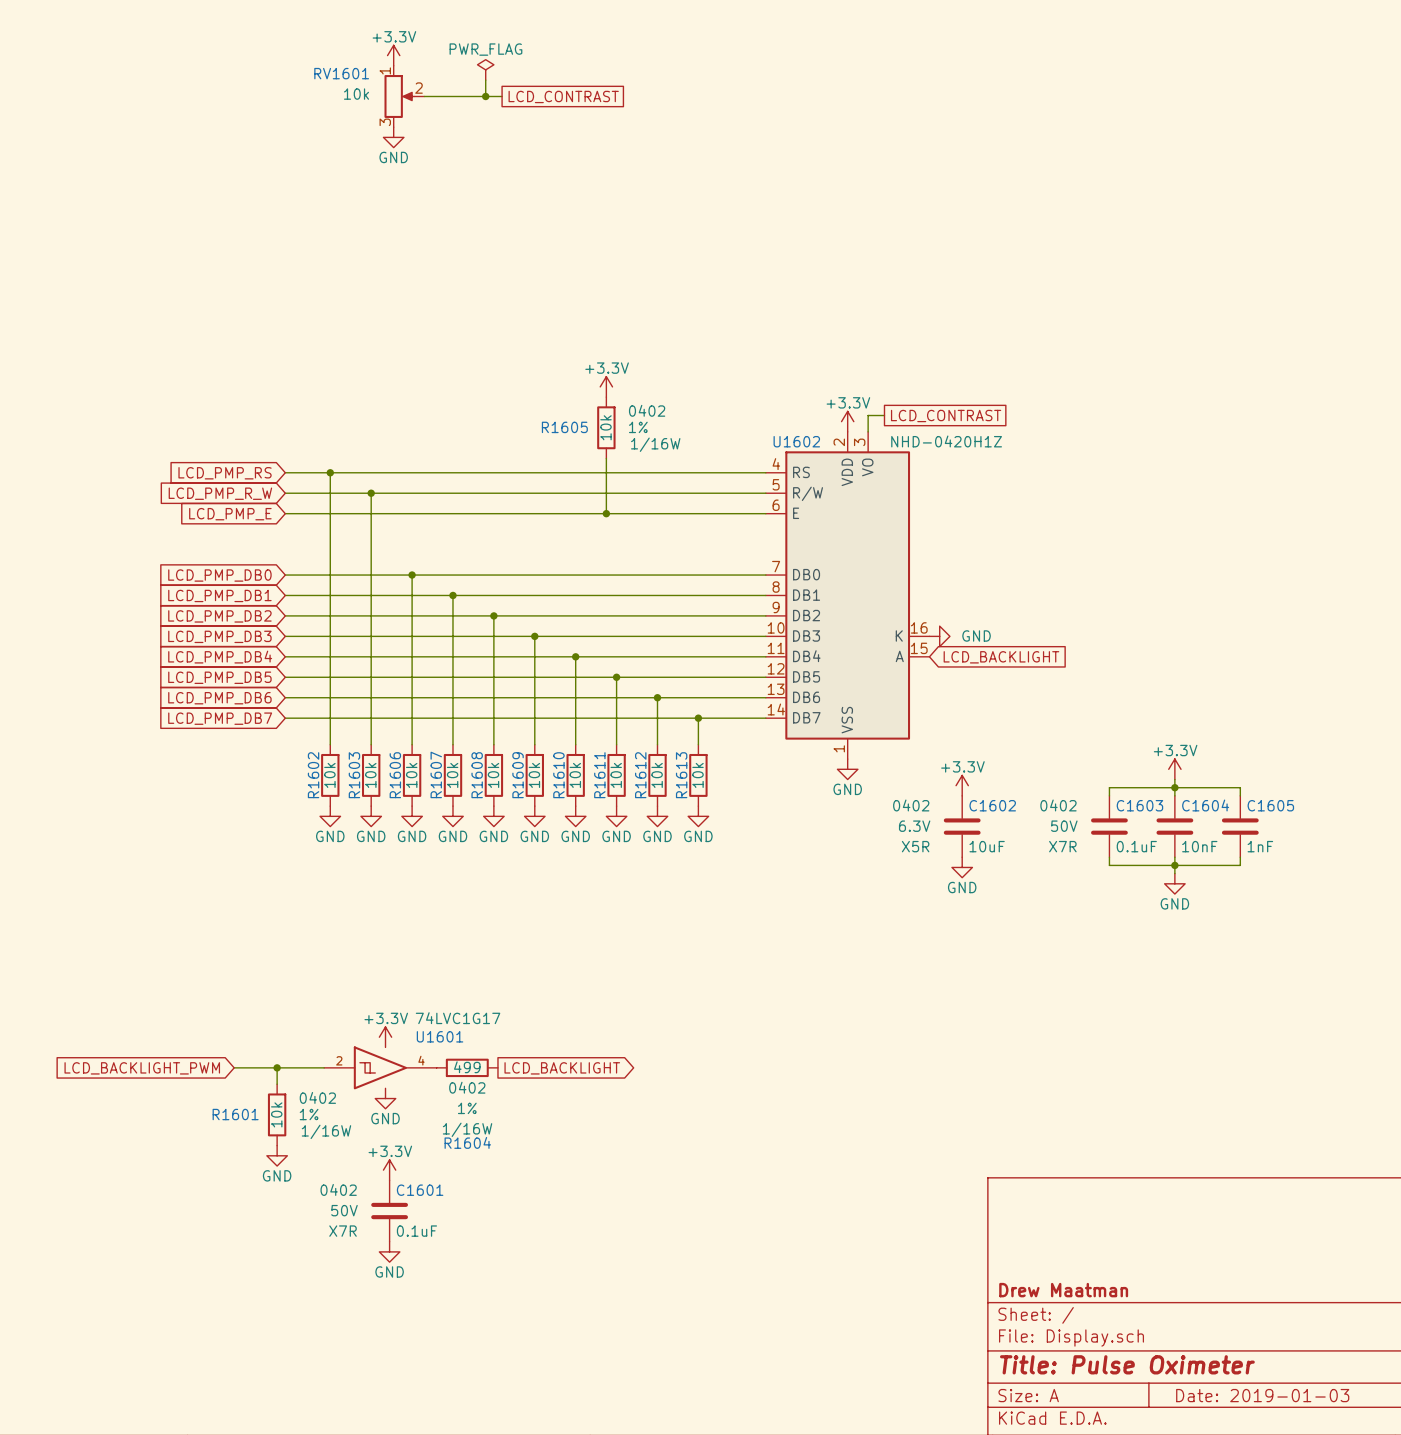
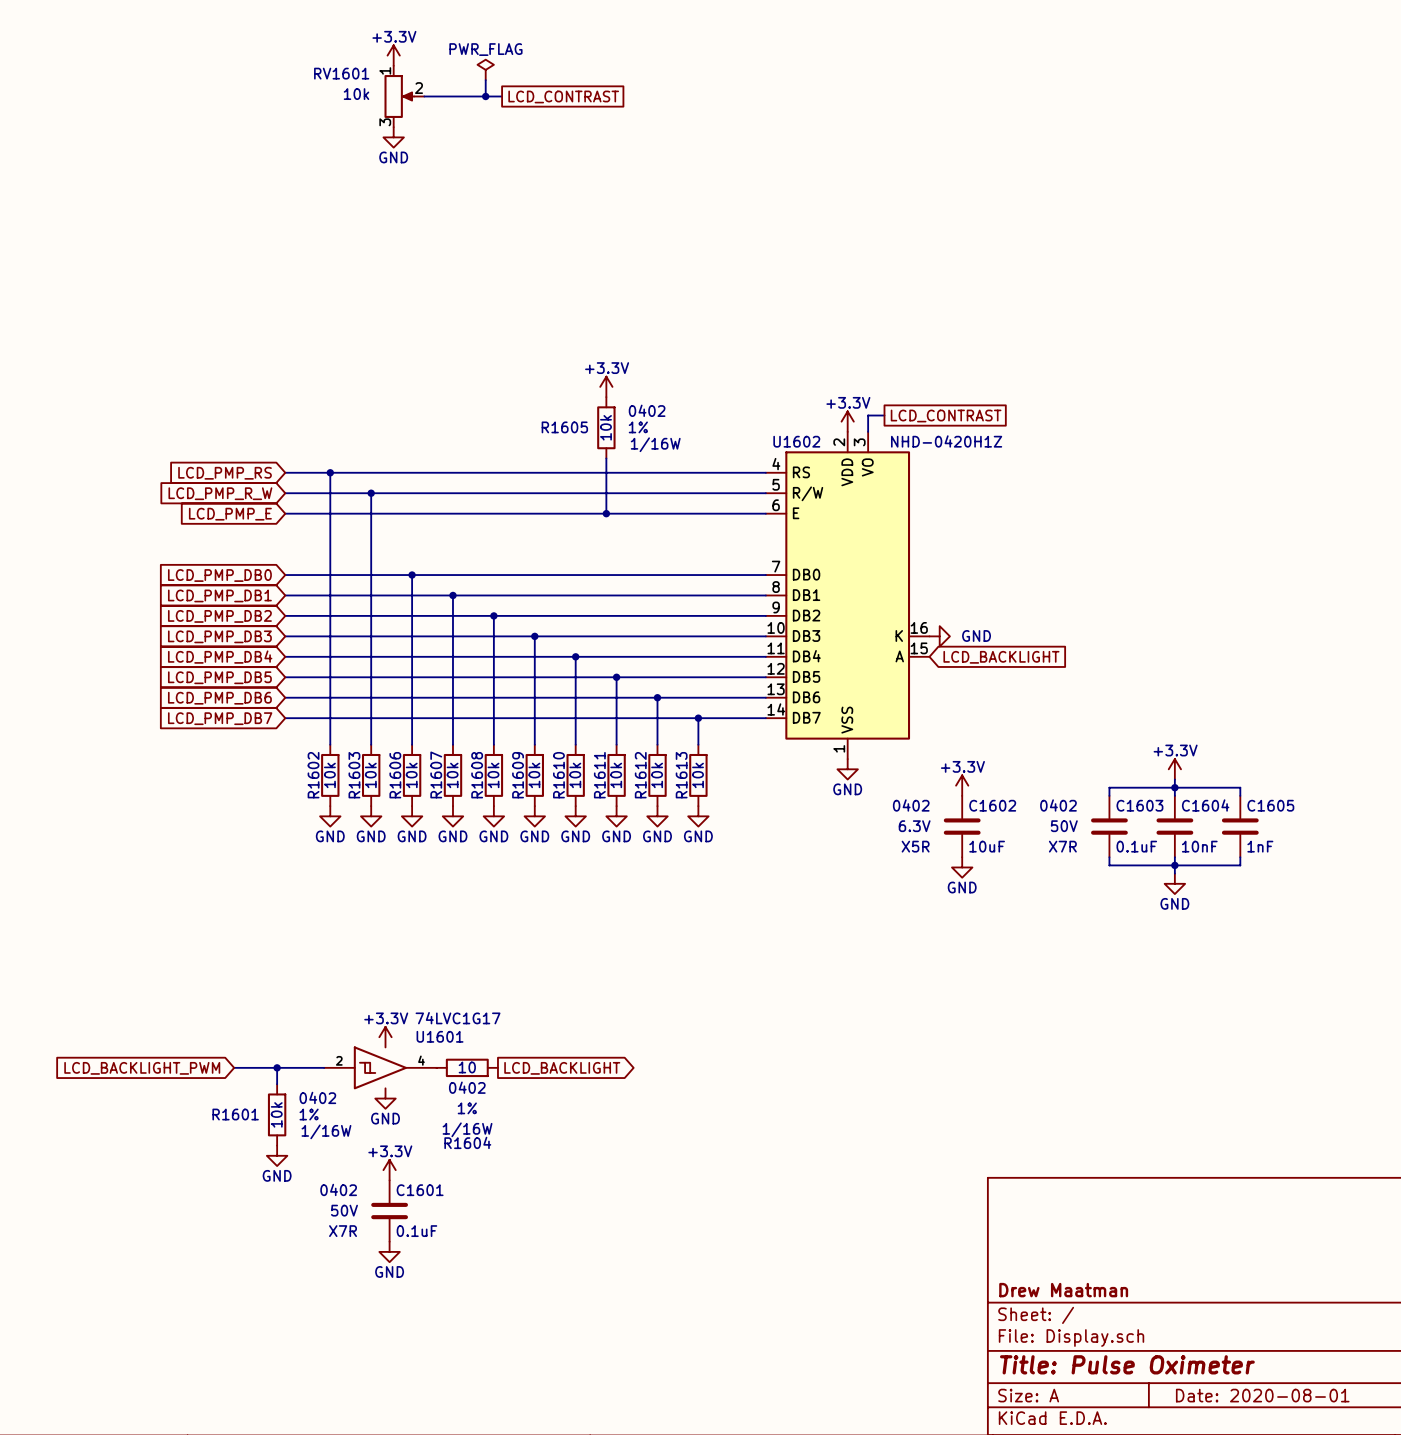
R1604 value: 499 (467, 1067) -> 10 (467, 1067)
title block: Date: 2019-01-03 (1262, 1395) -> Date: 2020-08-01 (1262, 1395)

